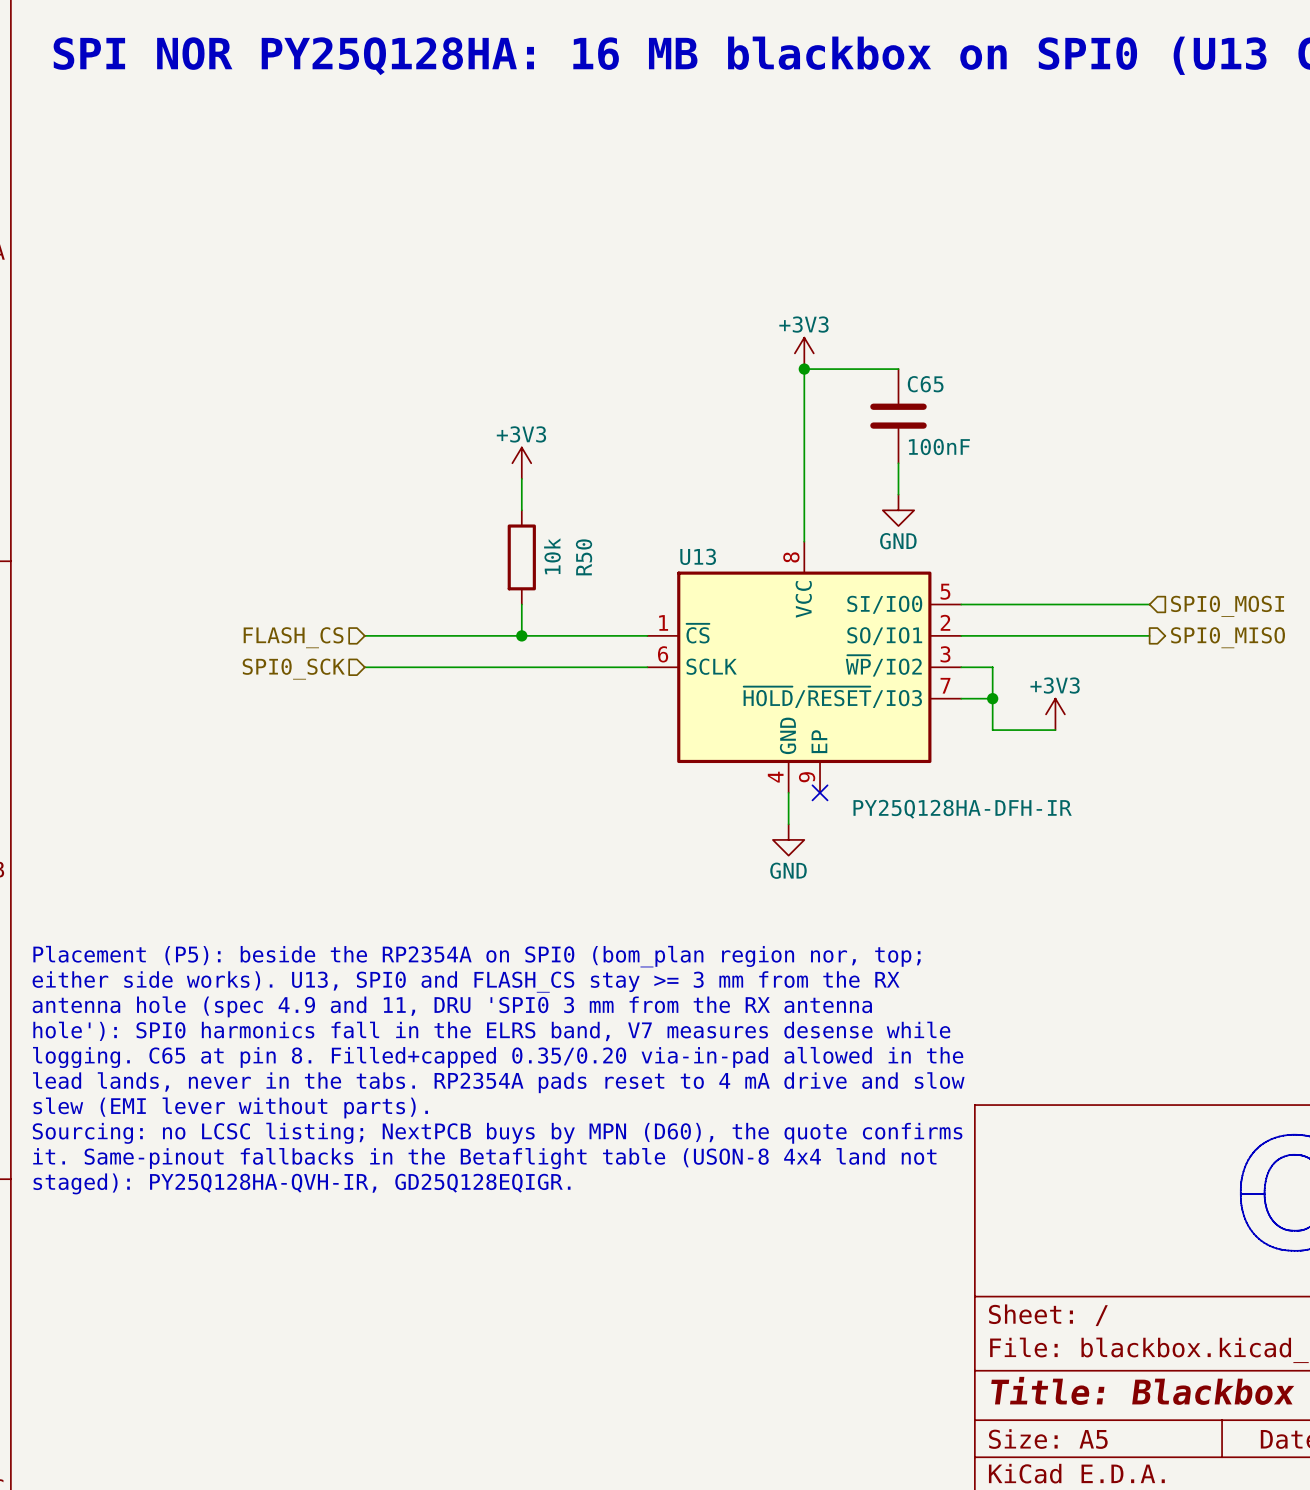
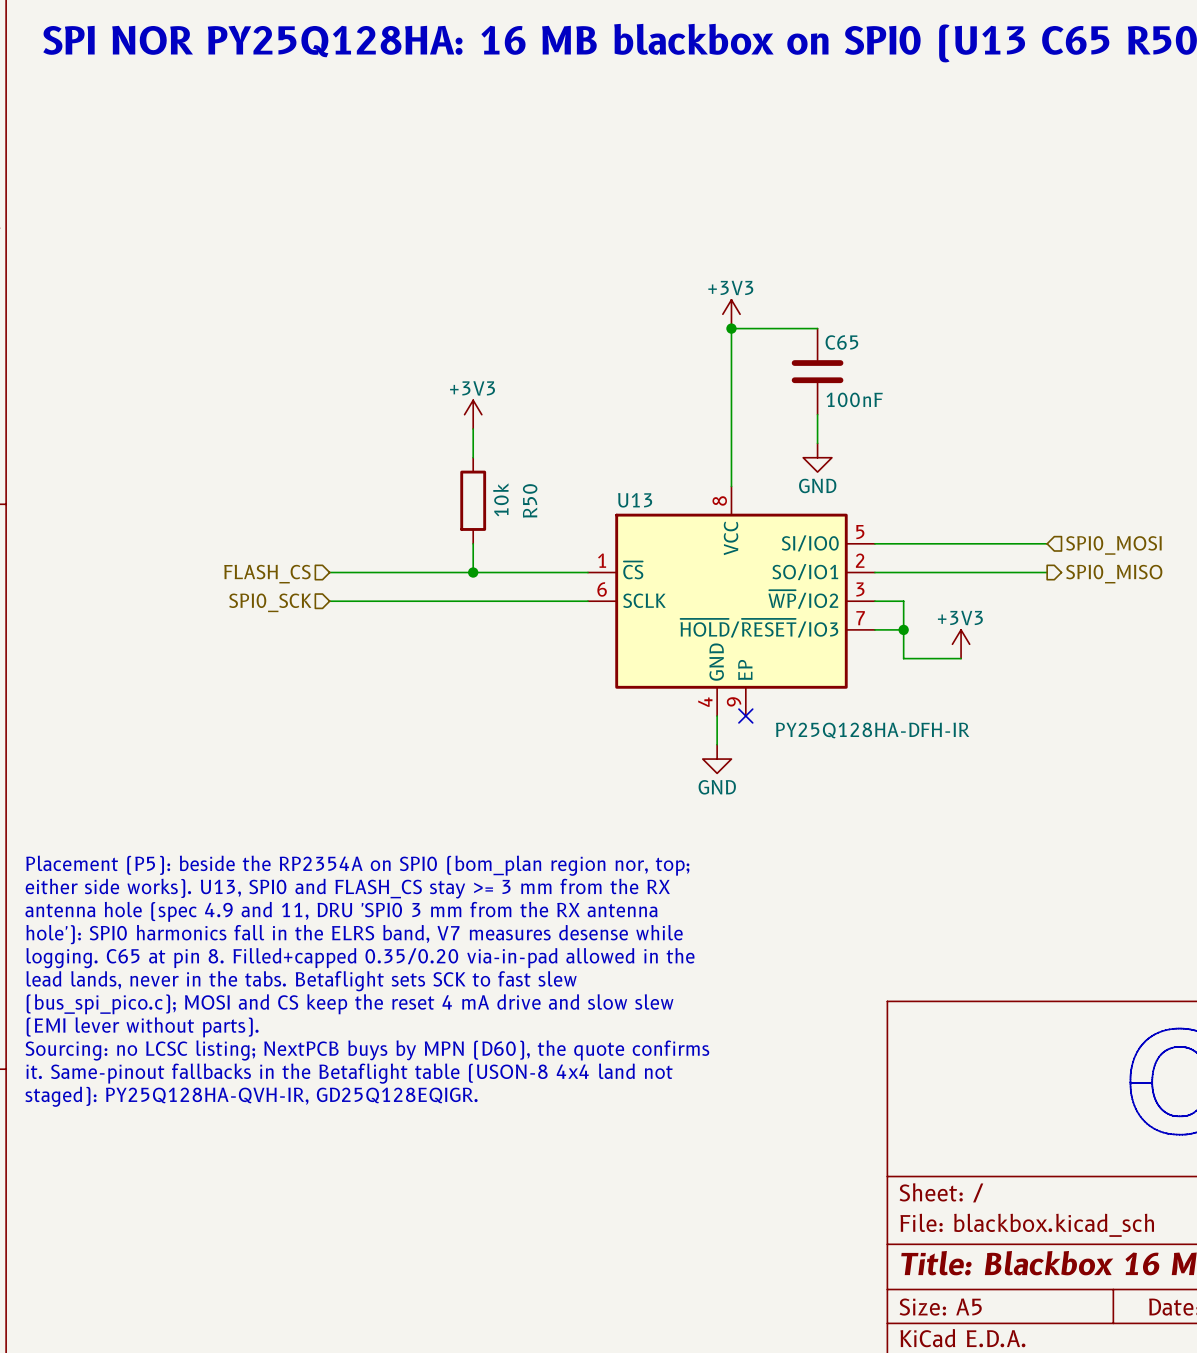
text: lead lands, never in the tabs. RP2354A pads reset to 4 mA drive and slow (498, 1082) -> lead lands, never in the tabs. Betaflight sets SCK to fast slew (301, 981)
text: slew (EMI lever without parts). (230, 1107) -> (bus_spi_pico.c); MOSI and CS keep the reset 4 mA drive and slow slew (350, 1004)
text: Sourcing: no LCSC listing; NextPCB buys by MPN (D60), the quote confirms (497, 1133) -> (EMI lever without parts). (142, 1027)
text: it. Same-pinout fallbacks in the Betaflight table (USON-8 4x4 land not (484, 1158) -> Sourcing: no LCSC listing; NextPCB buys by MPN (D60), the quote confirms (367, 1050)
text: staged): PY25Q128HA-QVH-IR, GD25Q128EQIGR. (302, 1183) -> it. Same-pinout fallbacks in the Betaflight table (USON-8 4x4 land not (349, 1073)
text: none -> staged): PY25Q128HA-QVH-IR, GD25Q128EQIGR. (251, 1096)

